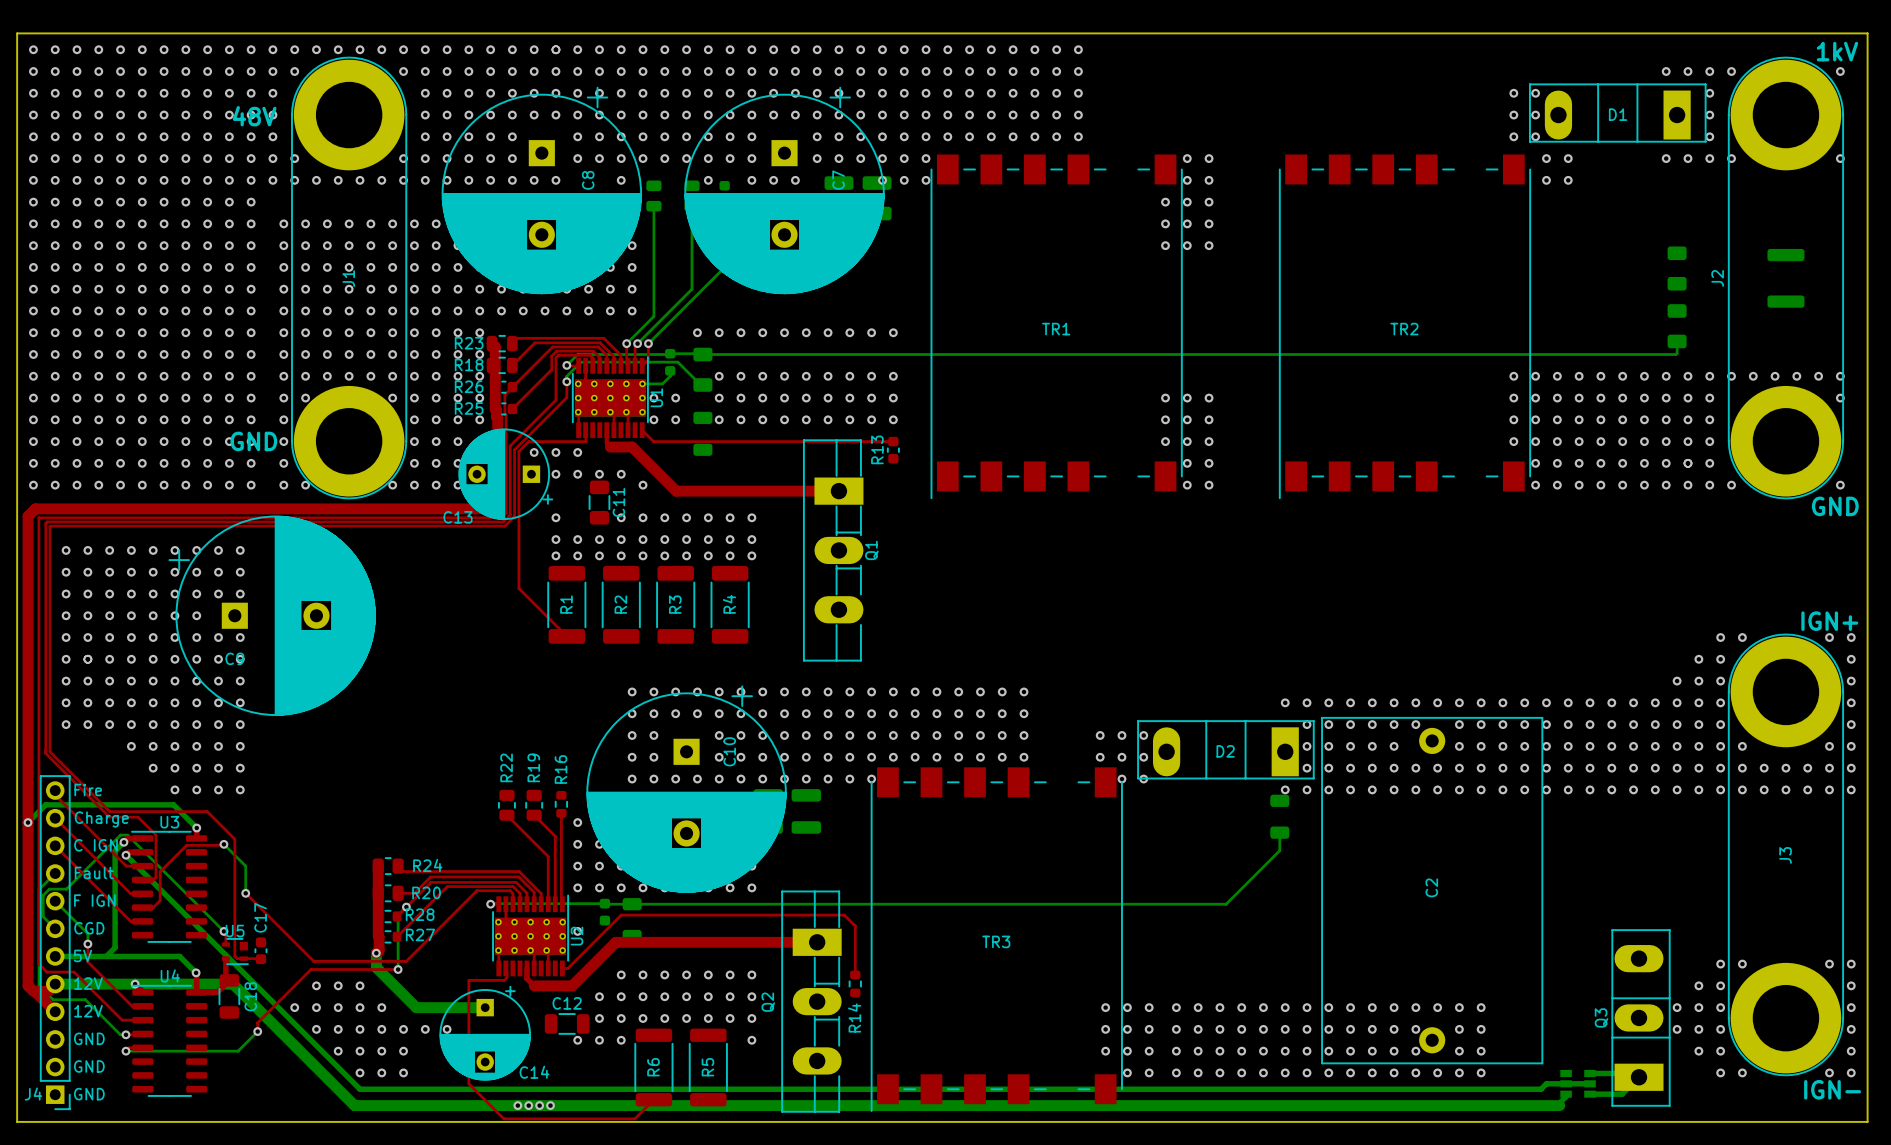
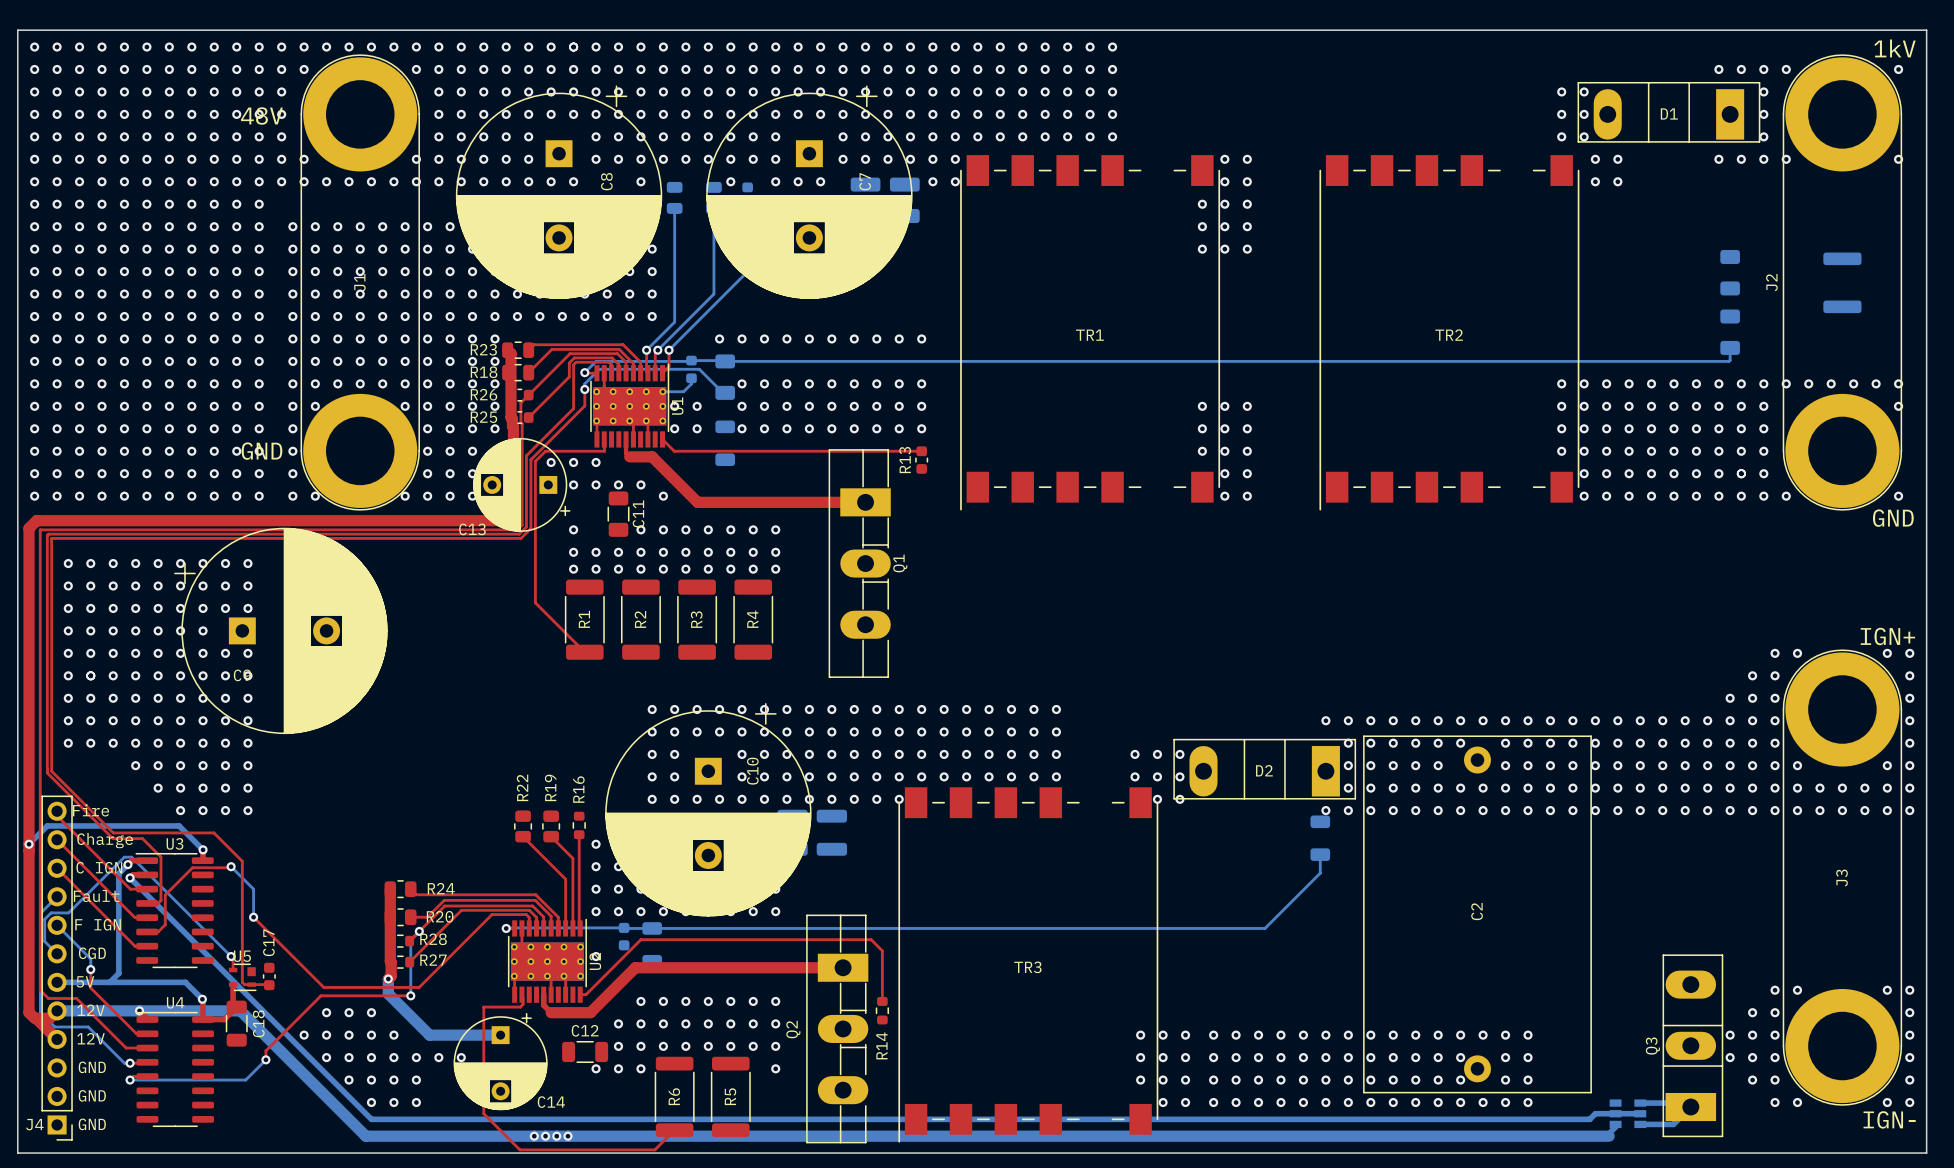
via: (882, 180) -> none

